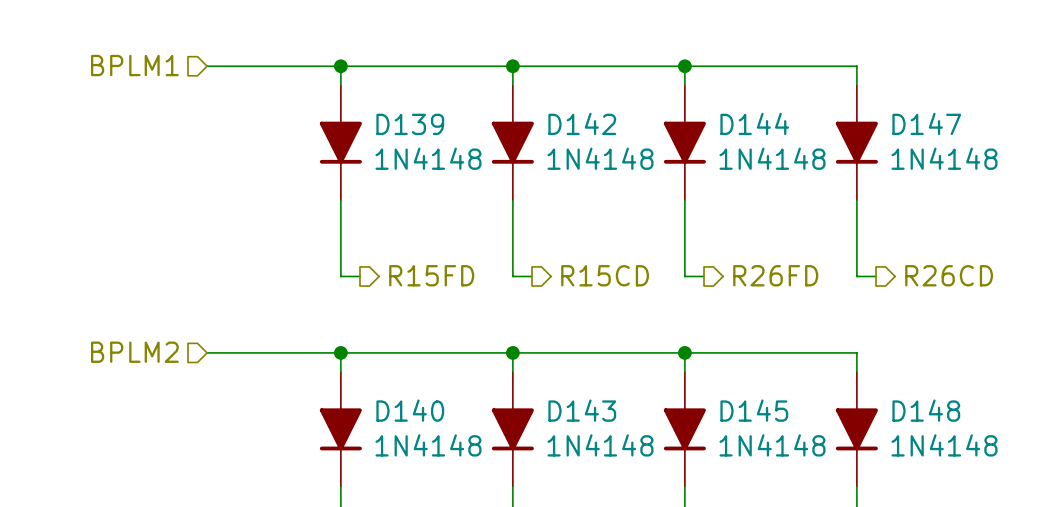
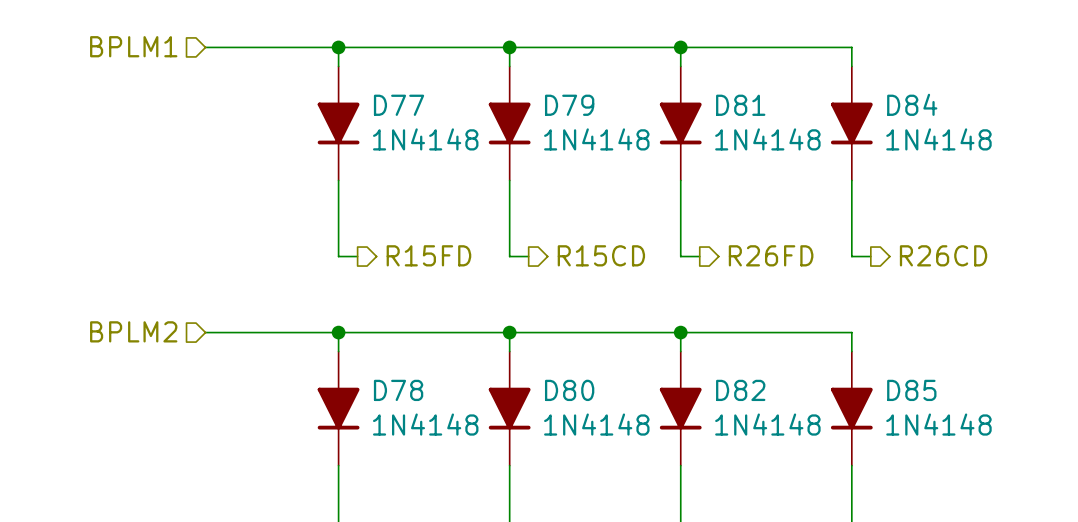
D142 name: D142 (582, 123) -> D79 (569, 105)
D144 name: D144 (754, 123) -> D81 (740, 105)
D147 name: D147 (926, 123) -> D84 (912, 104)
D139 name: D139 (410, 124) -> D77 (399, 105)
D140 name: D140 (410, 410) -> D78 (398, 390)
D143 name: D143 (582, 410) -> D80 (569, 390)
D145 name: D145 (754, 410) -> D82 (740, 390)
D148 name: D148 (926, 410) -> D85 (911, 390)

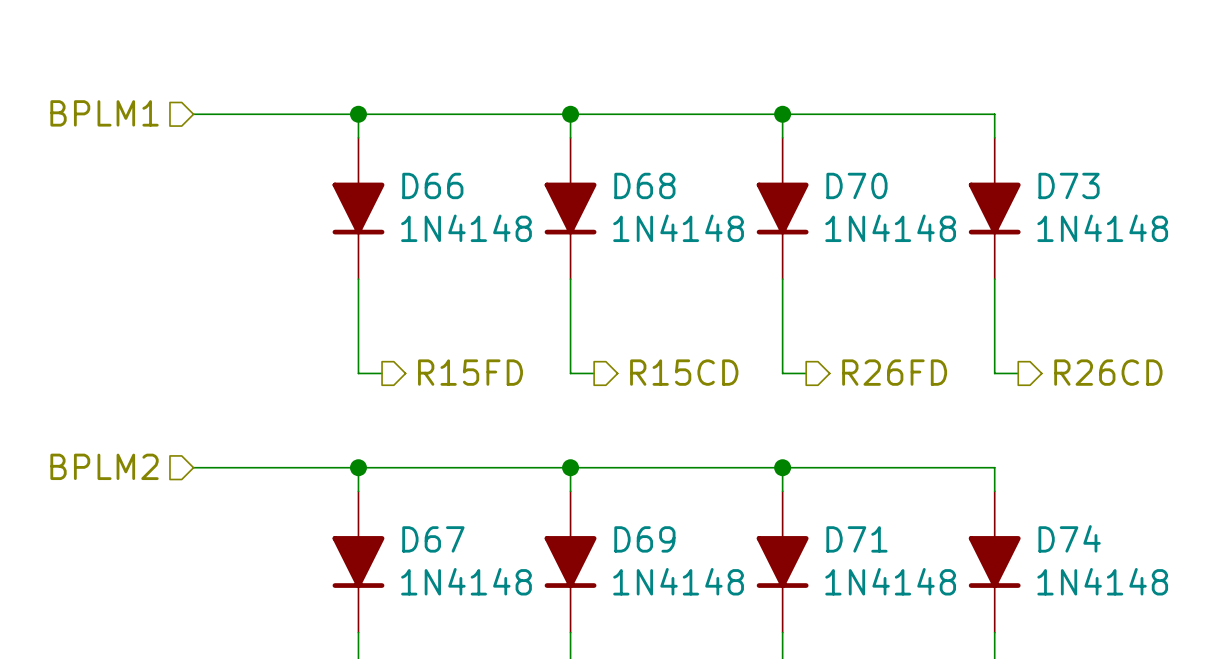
D84 name: D84 (912, 104) -> D73 (1069, 185)
D77 name: D77 (399, 105) -> D66 (432, 185)
D79 name: D79 (569, 105) -> D68 (644, 185)
D81 name: D81 (740, 105) -> D70 (856, 185)
D78 name: D78 (398, 390) -> D67 (433, 539)
D80 name: D80 (569, 390) -> D69 (644, 539)
D82 name: D82 (740, 390) -> D71 (856, 539)
D85 name: D85 (911, 390) -> D74 (1069, 538)

